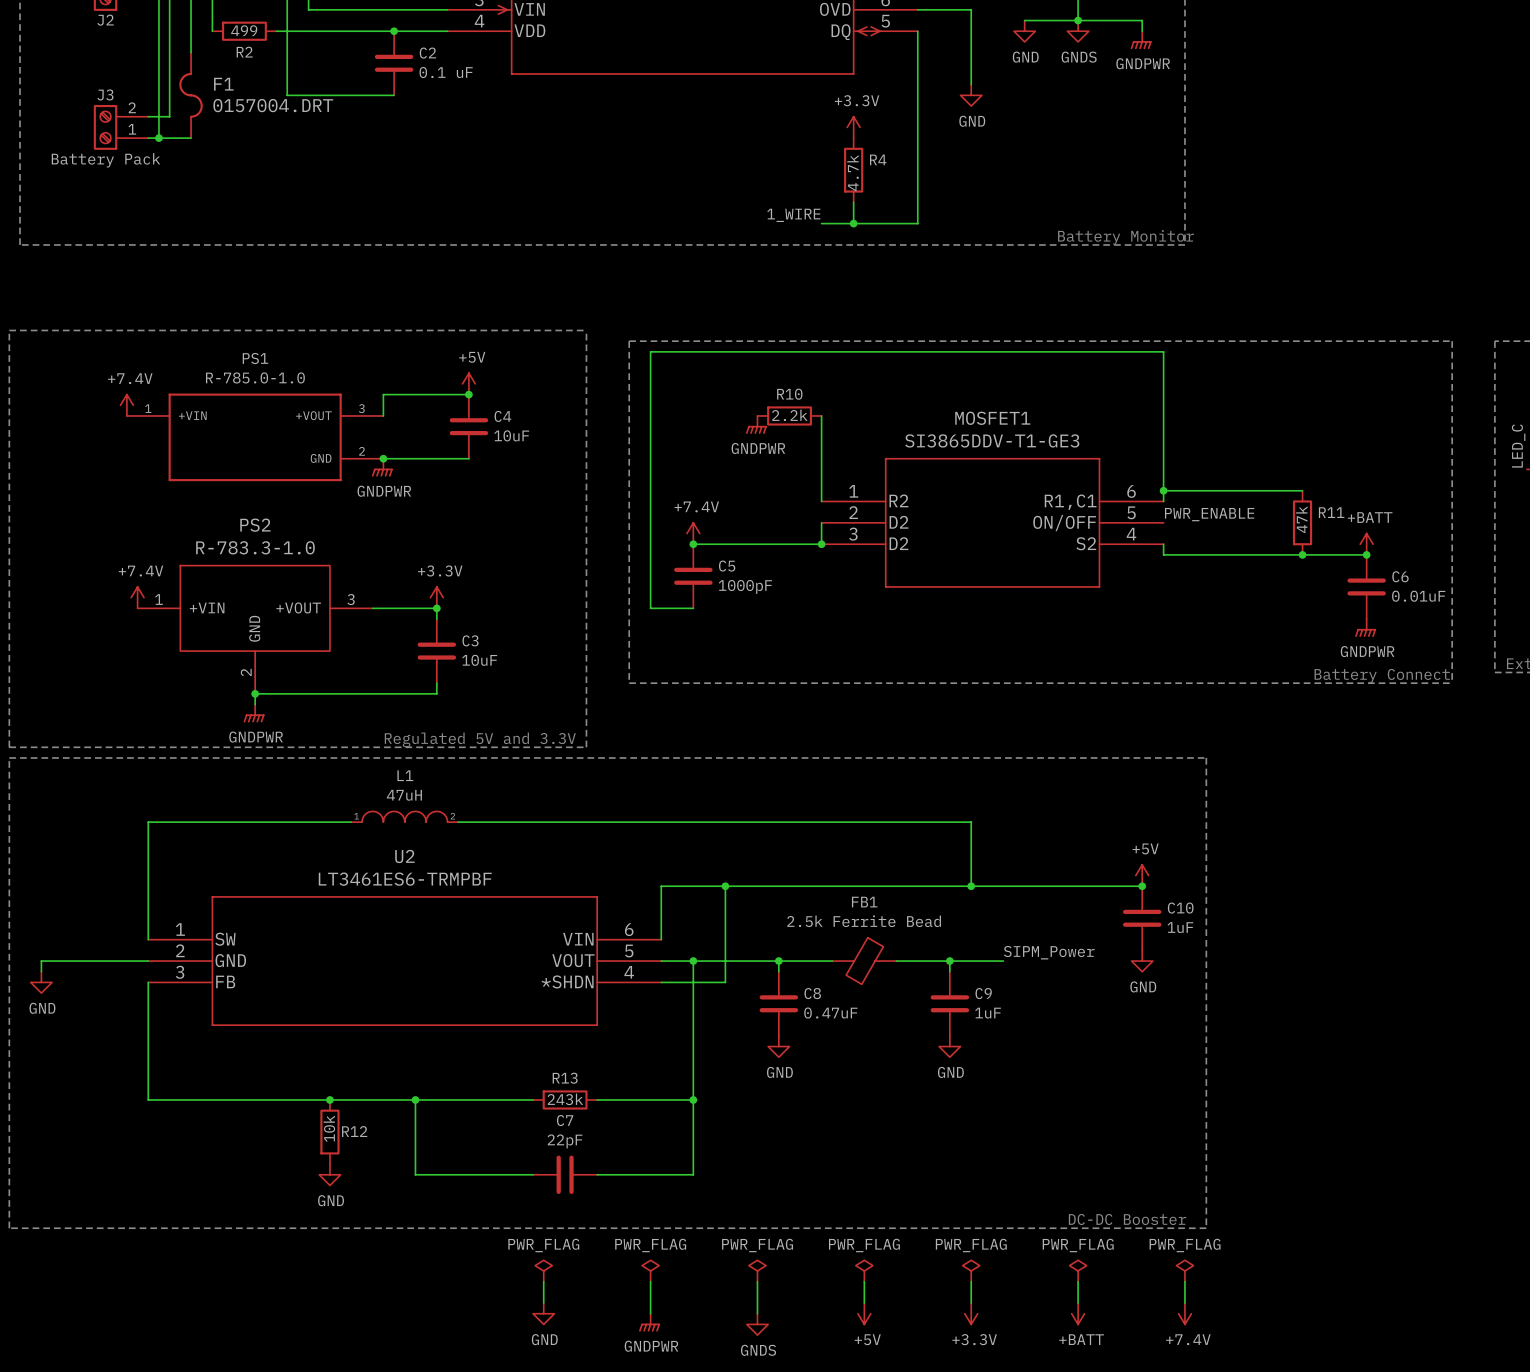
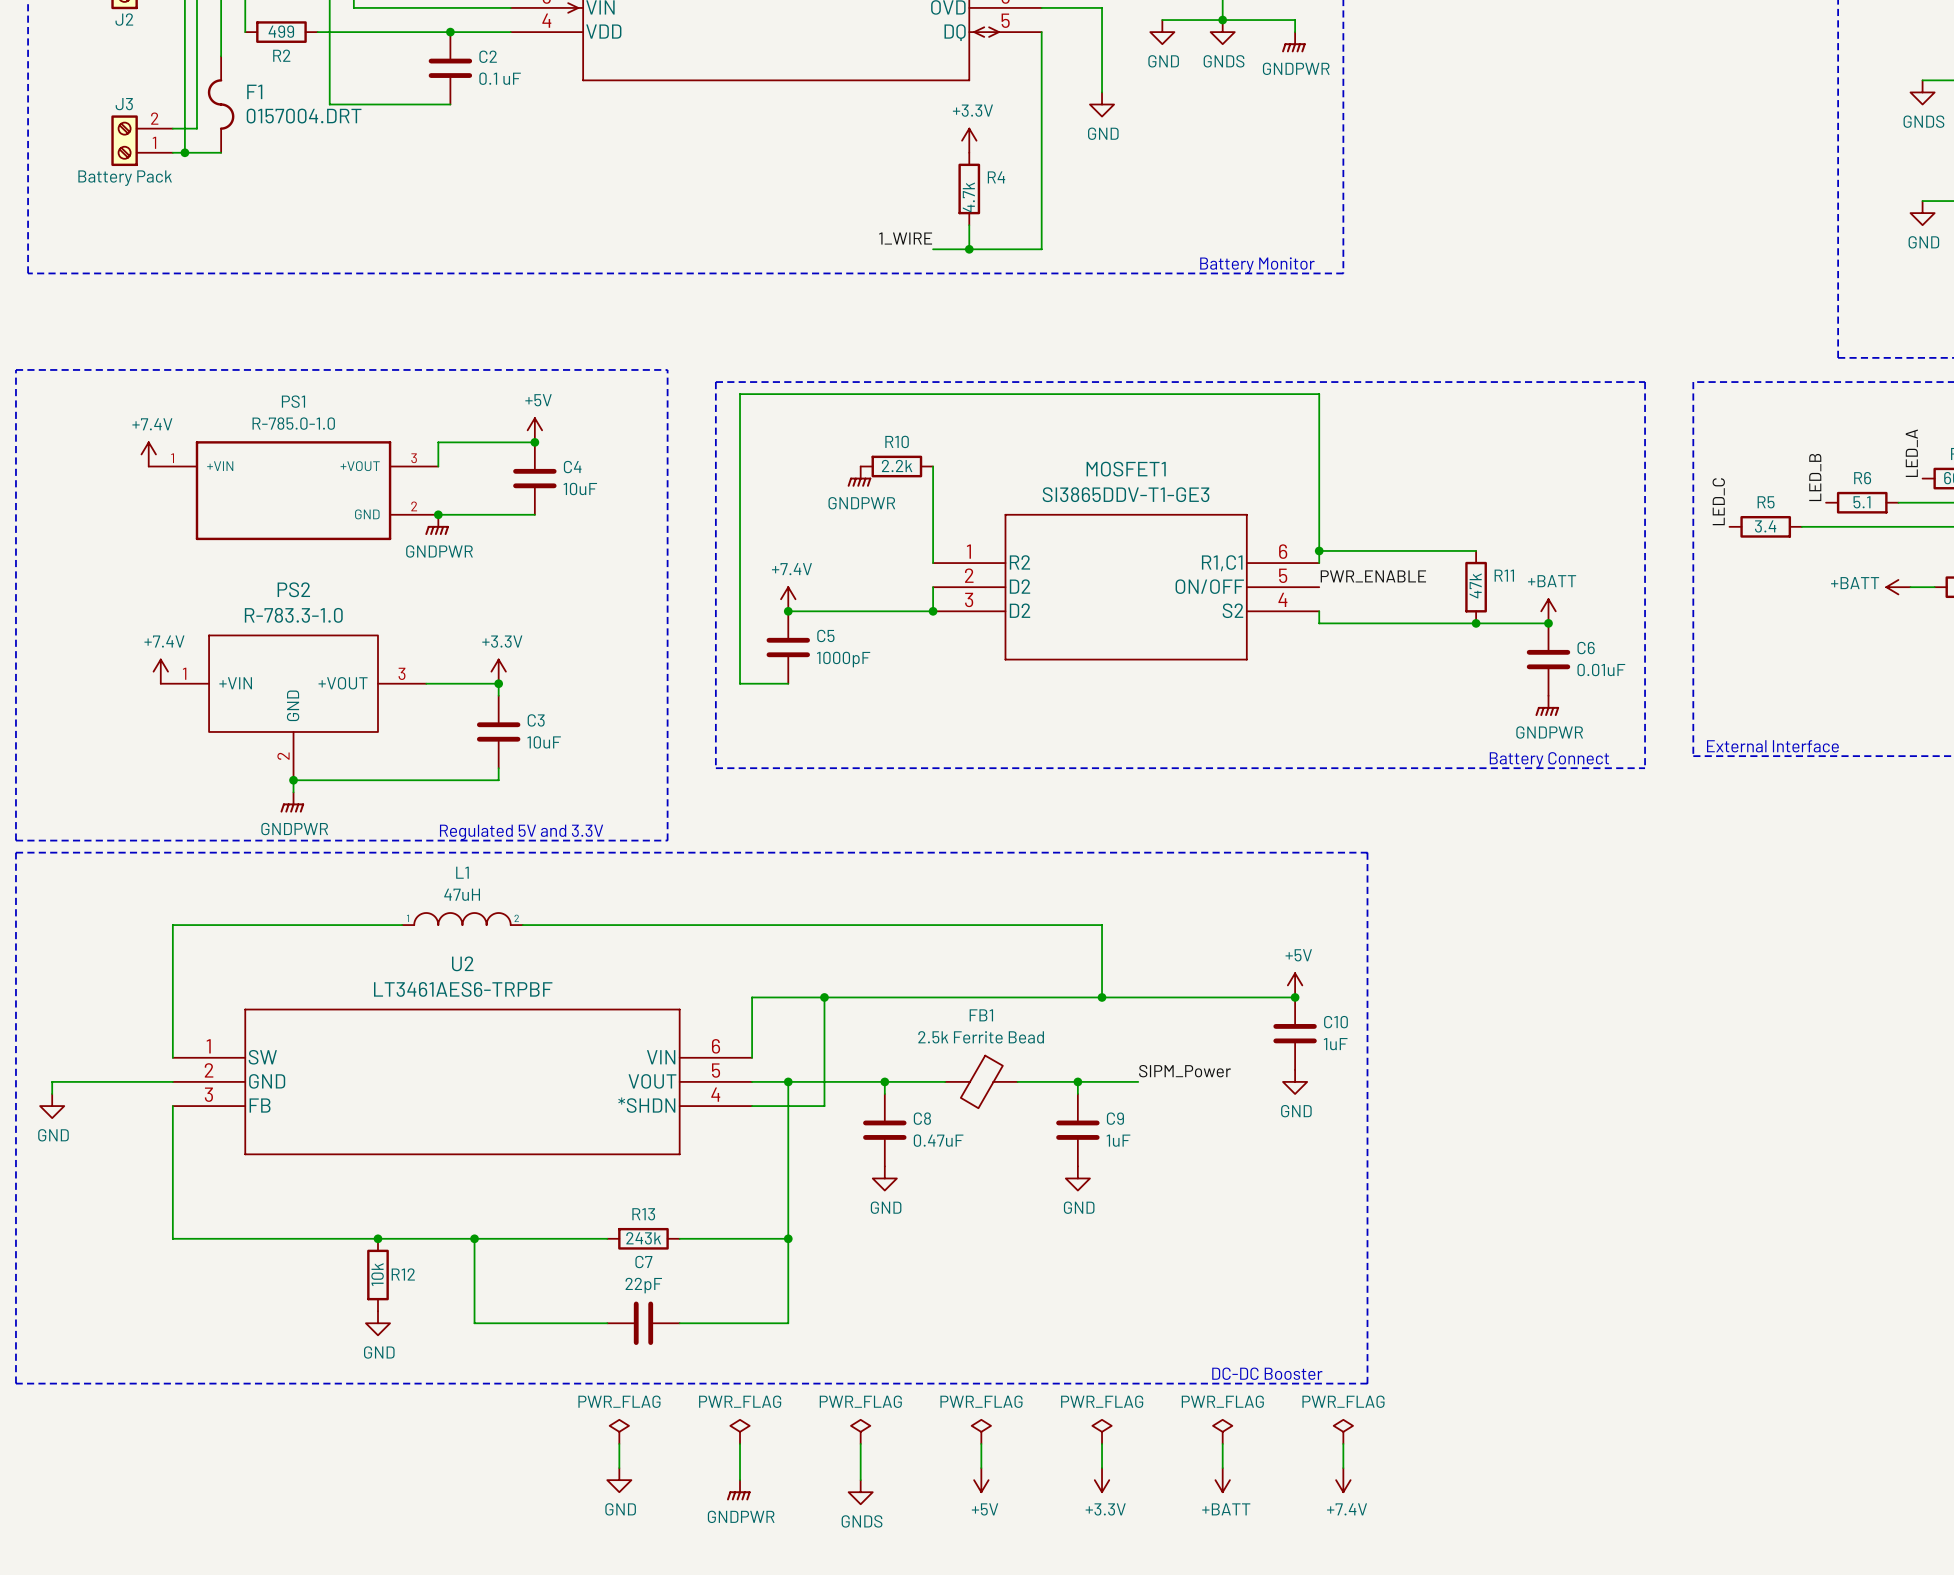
U2 value: LT3461ES6-TRMPBF (405, 879) -> LT3461AES6-TRPBF (463, 989)

